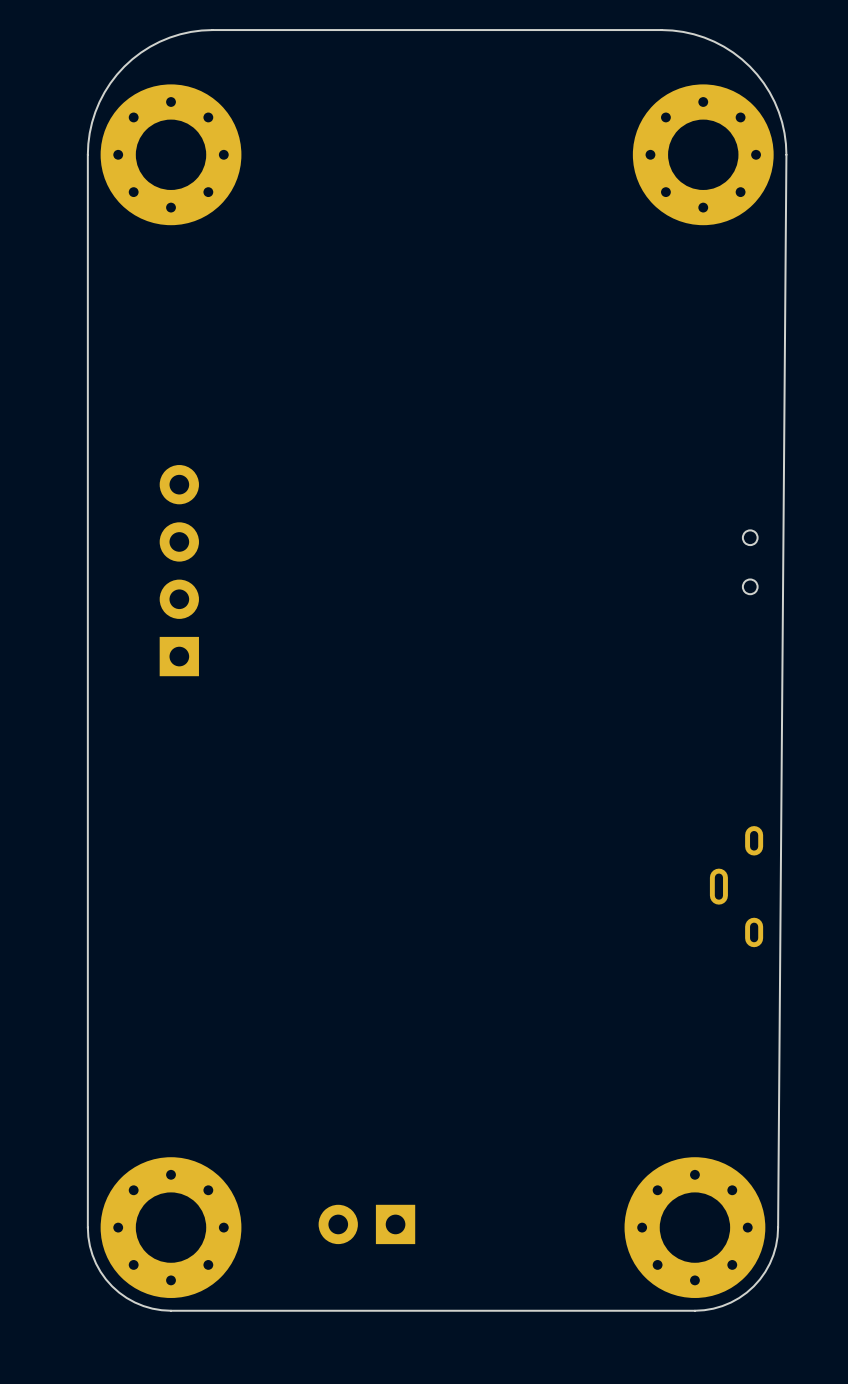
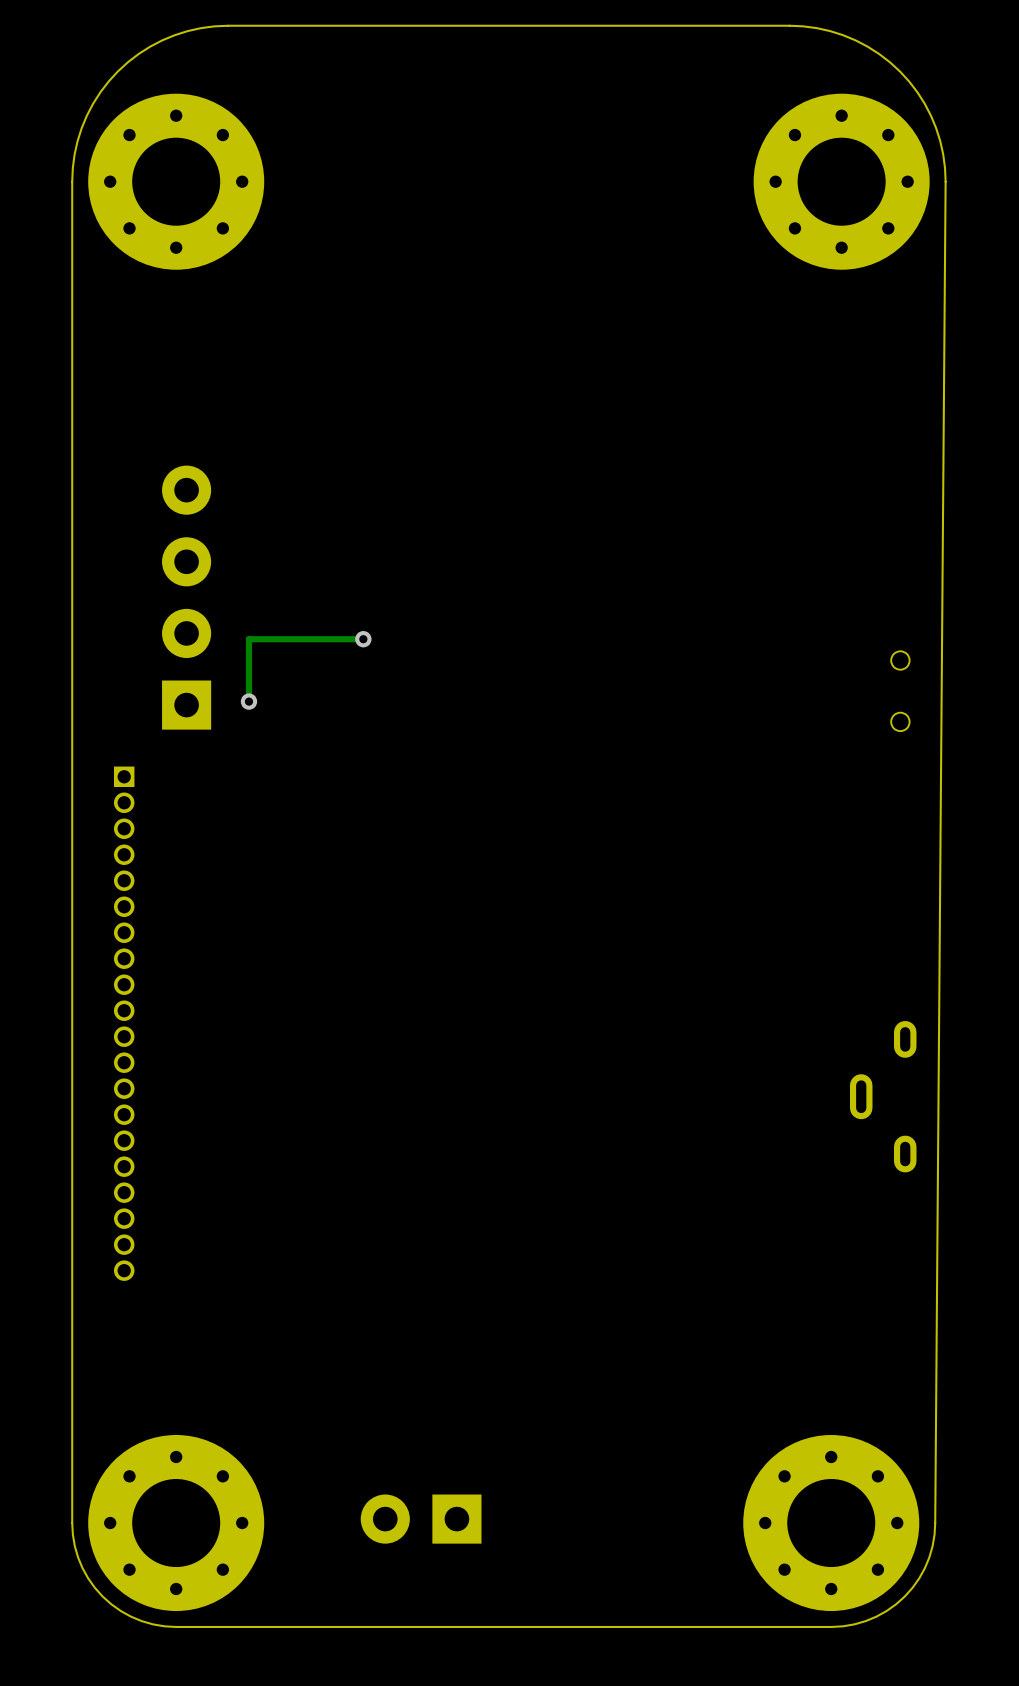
track: none -> (363, 639) (248, 639) (248, 701)
via: none -> (363, 639)
part position: (179, 570) -> (186, 597)
via: none -> (248, 701)
part: none -> (124, 1023)

